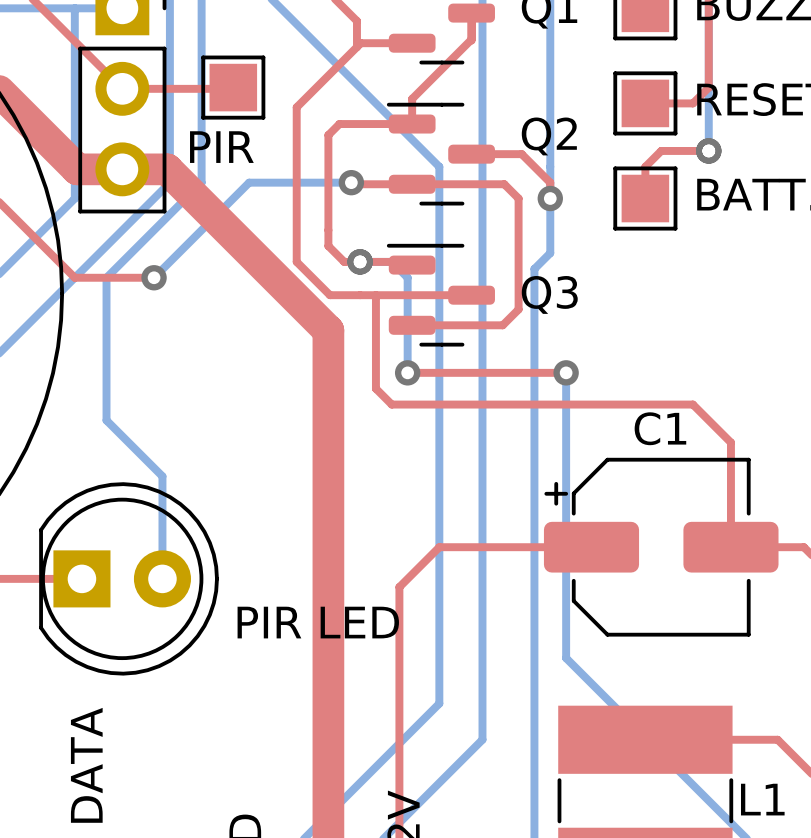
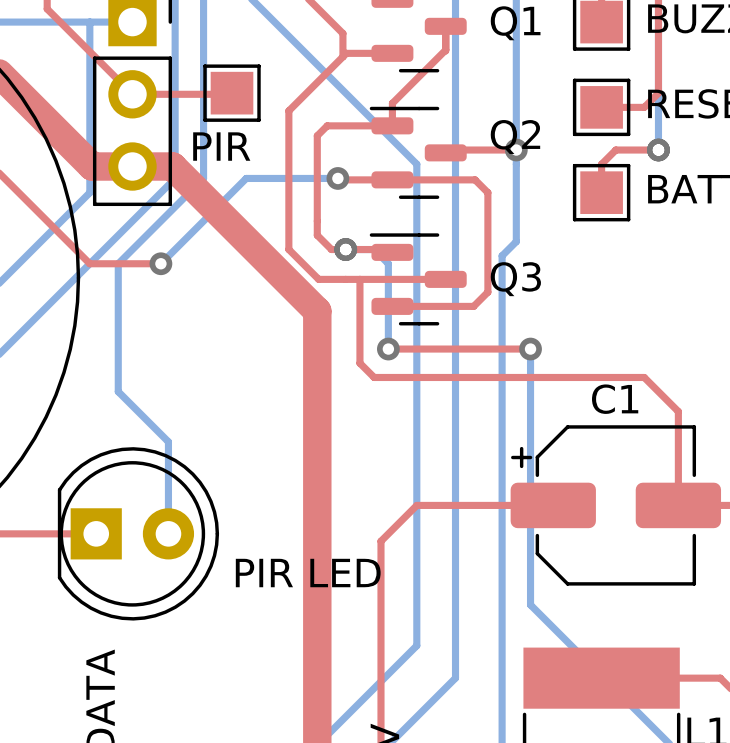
top track: (471, 154) (521, 154) (550, 182) (550, 198) -> (445, 152) (448, 150) (516, 150)
via position: (550, 198) -> (516, 150)

